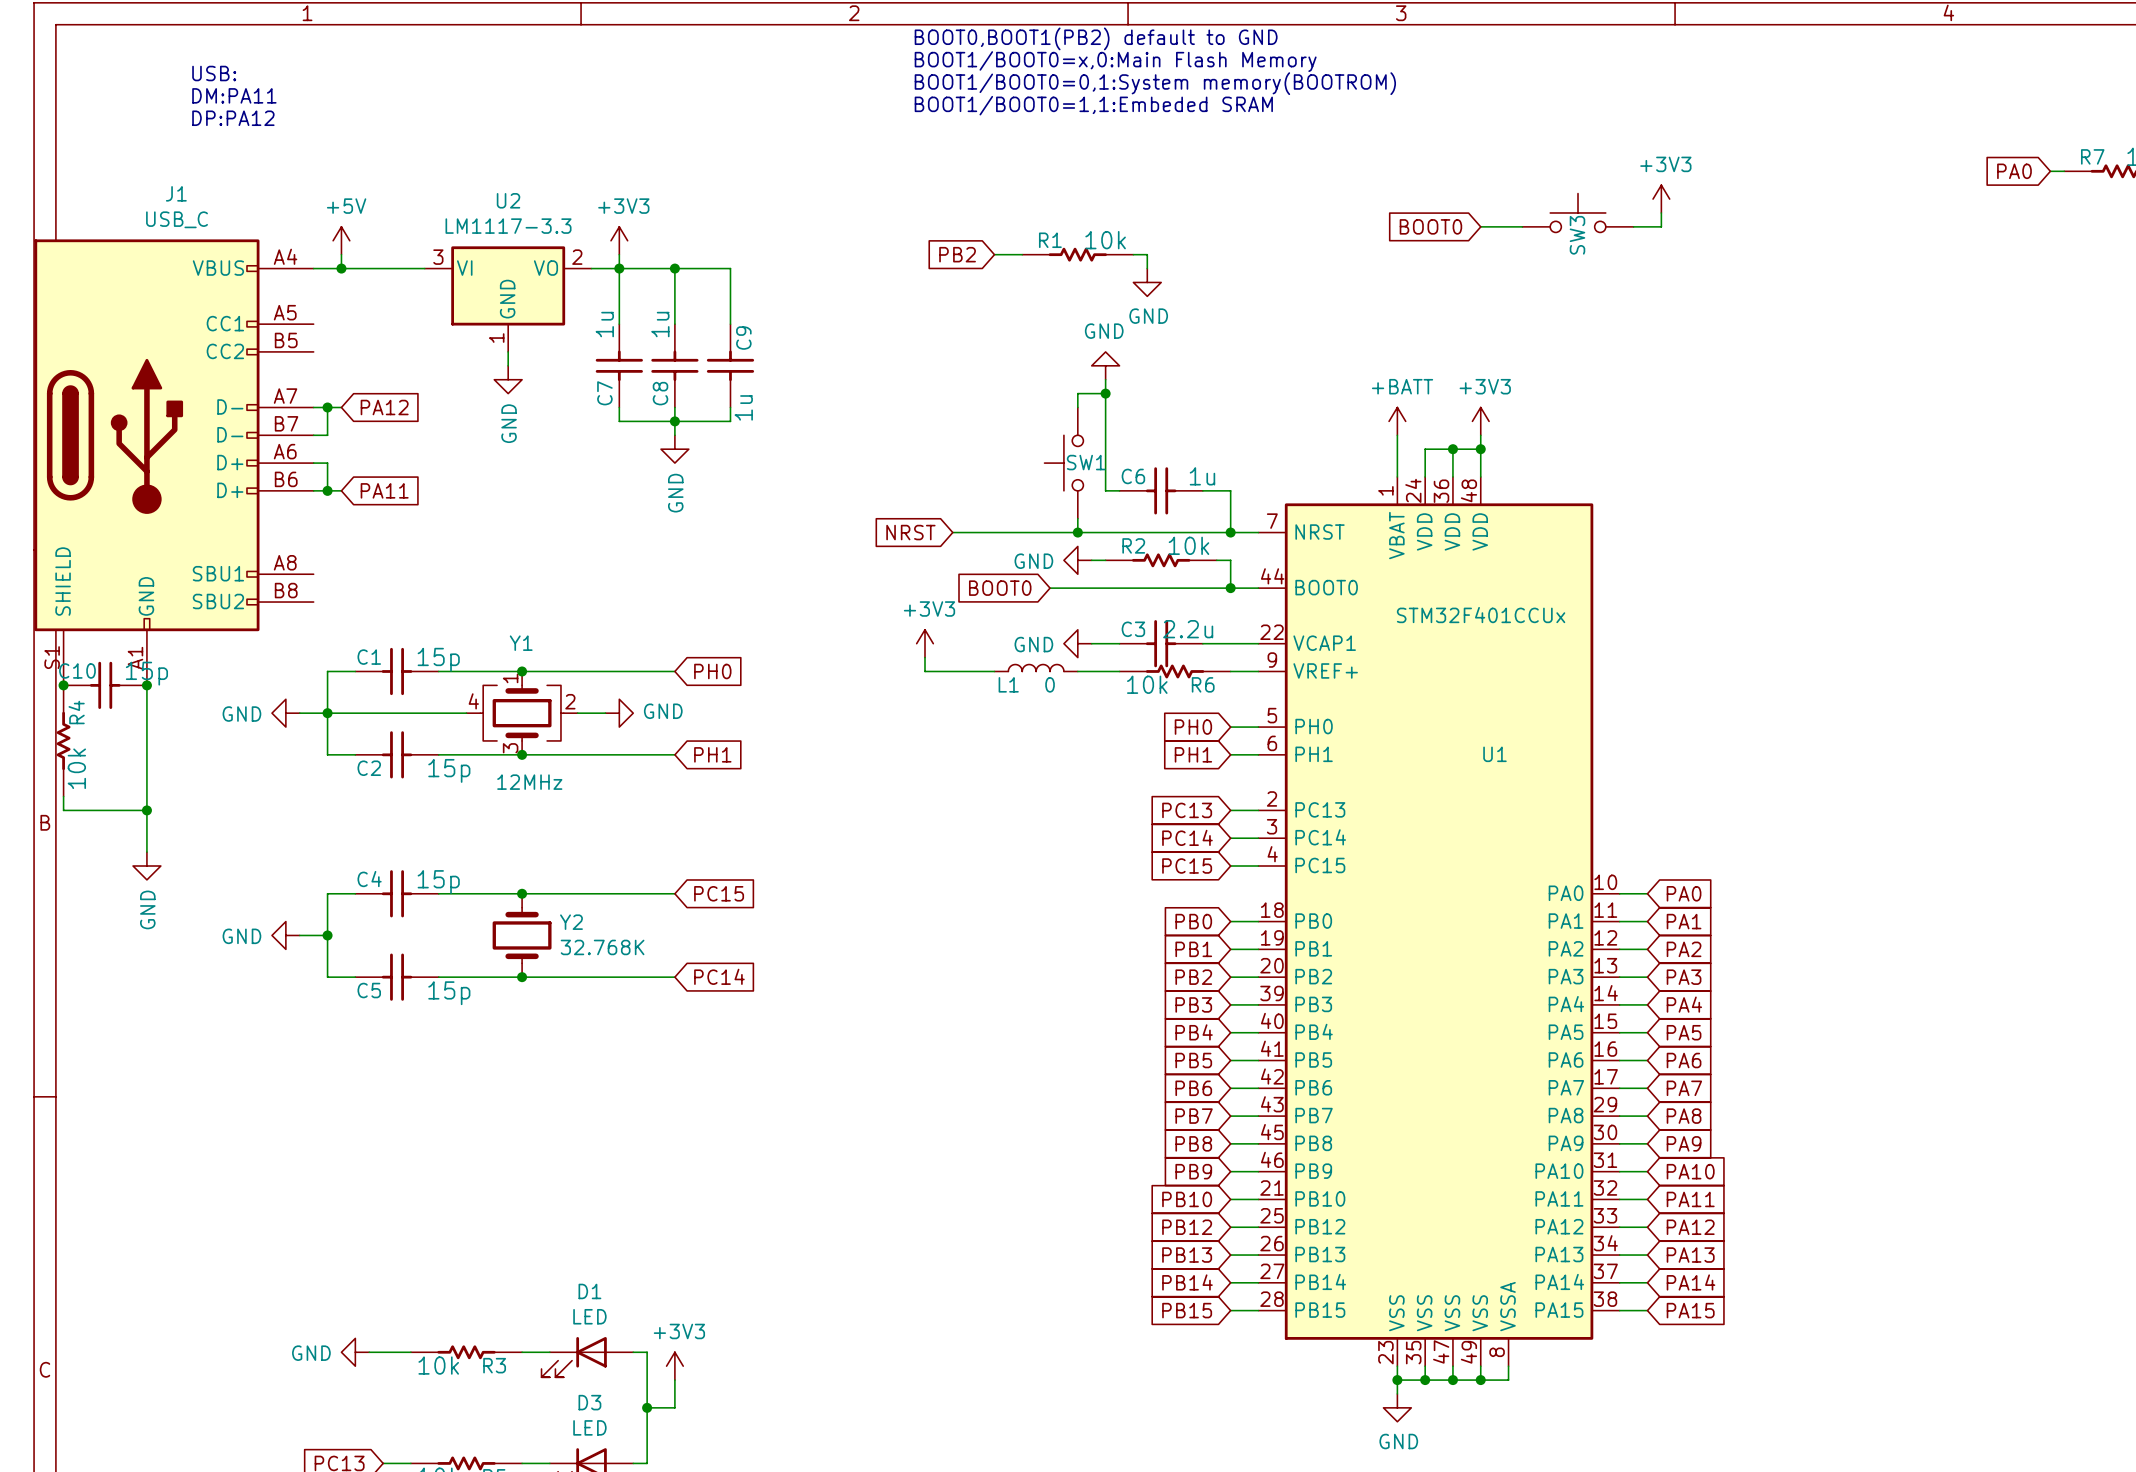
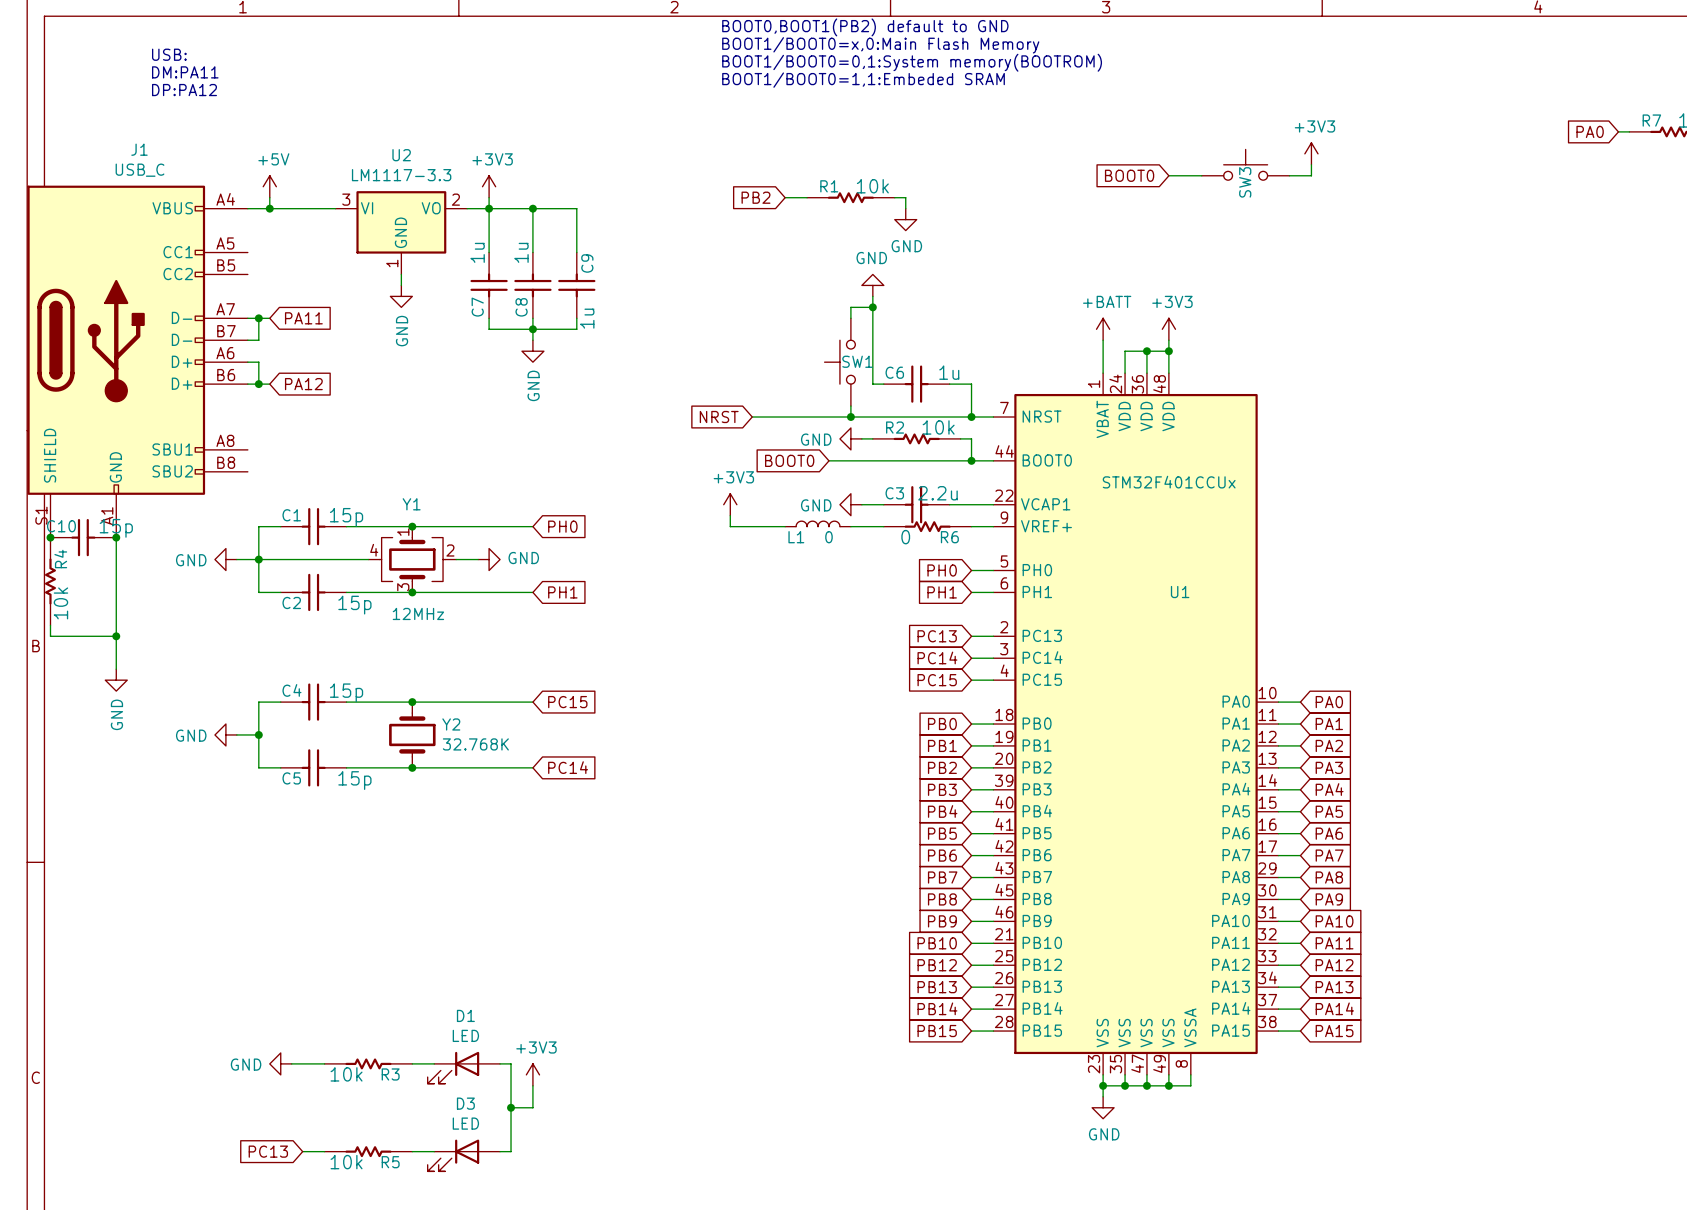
global label: PA12 (384, 407) -> PA11 (303, 318)
global label: PA11 (384, 490) -> PA12 (303, 384)
R6 value: 10k (1147, 684) -> 0 (905, 537)

